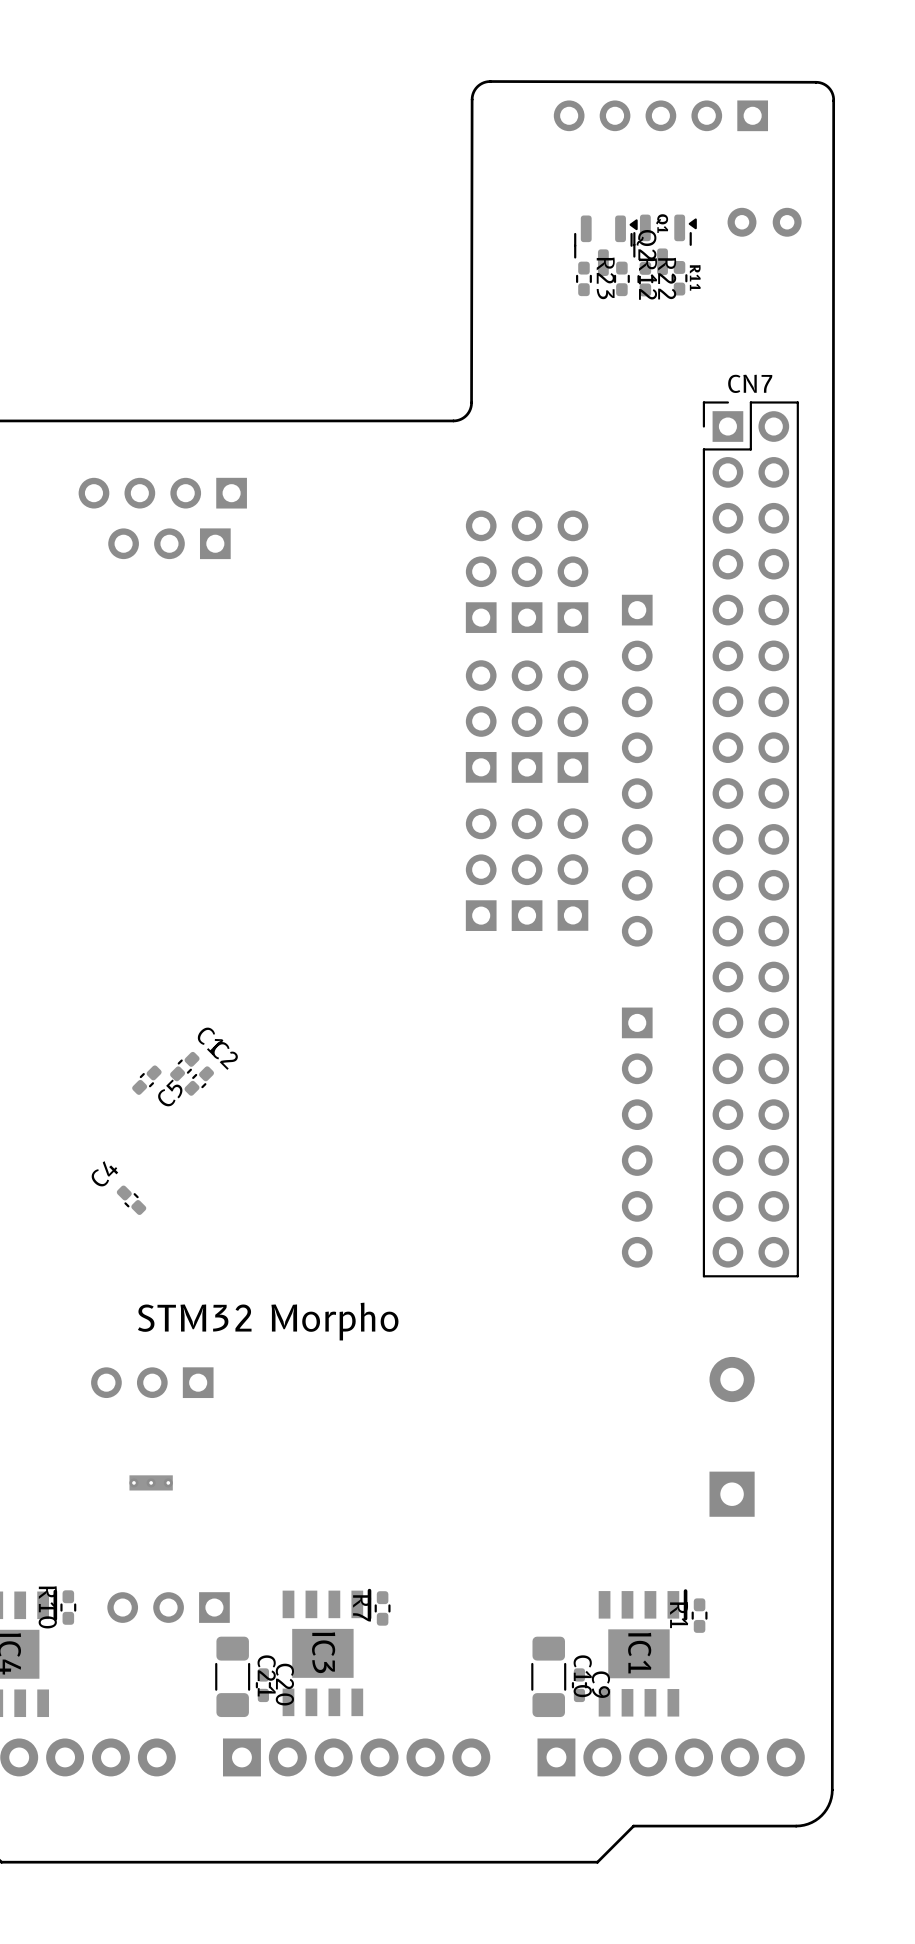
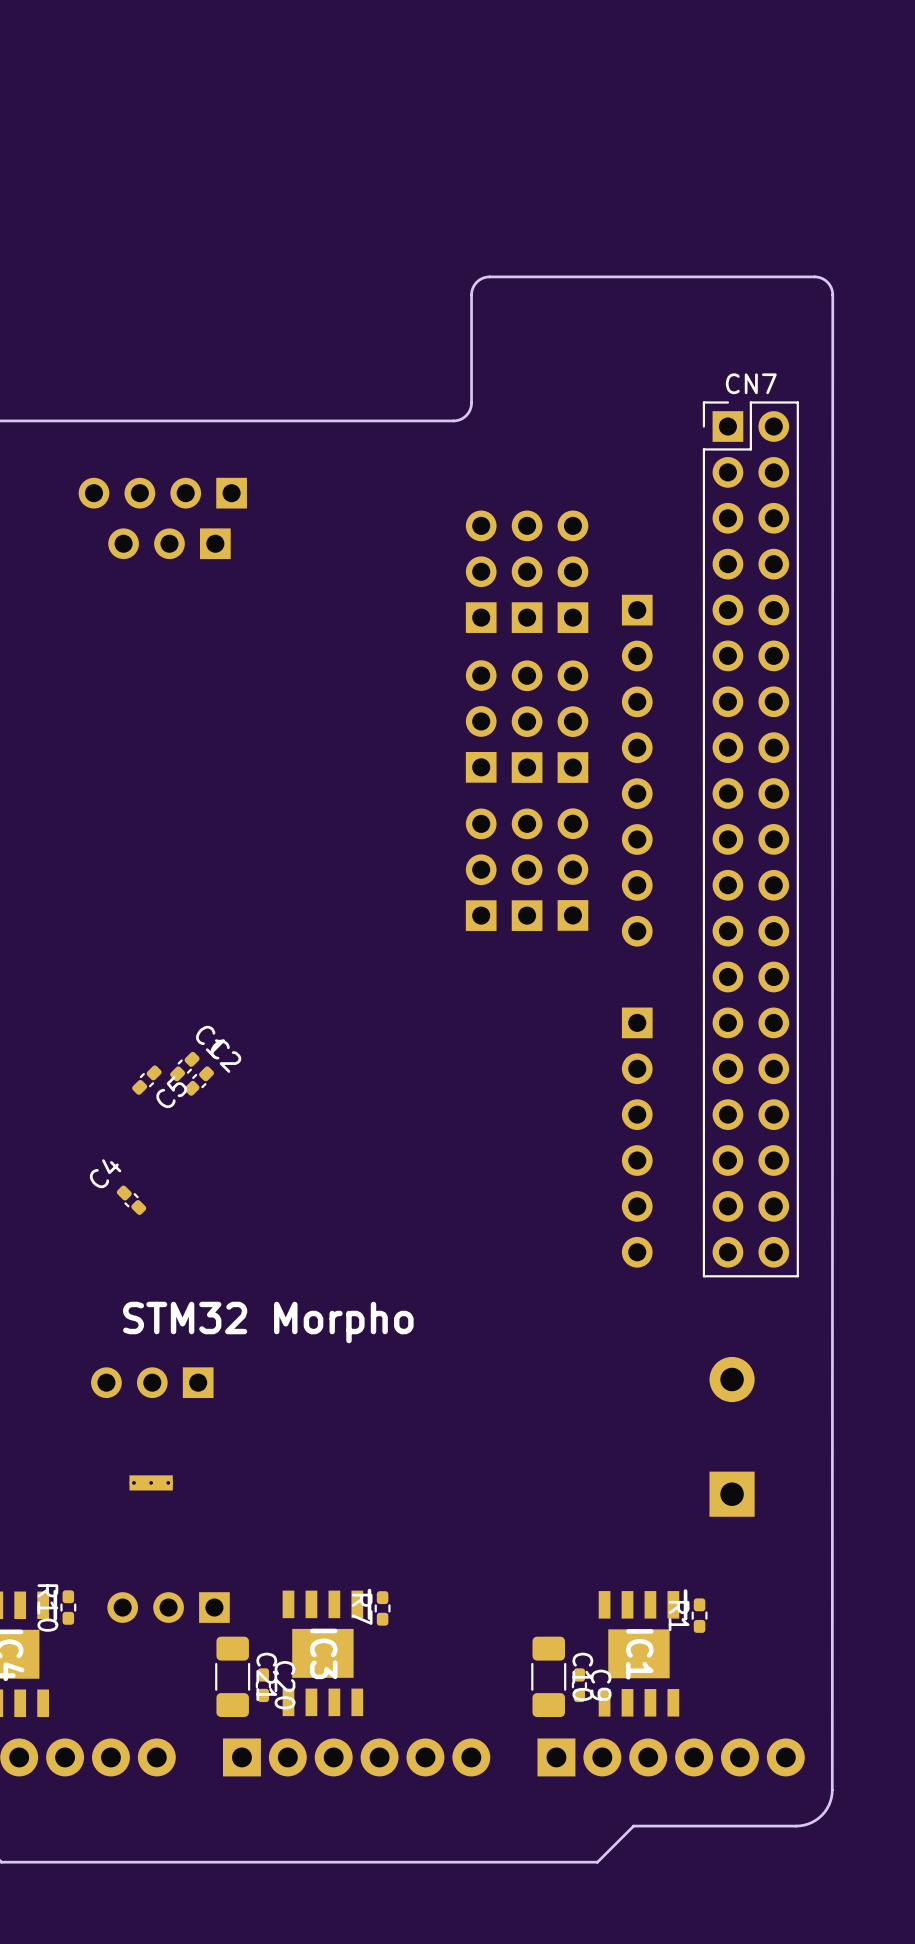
part: (660, 115) -> none
part: (764, 222) -> none
Q1: (665, 244) -> none
Q2: (605, 245) -> none
R23: (583, 278) -> none
R12: (621, 278) -> none
R11: (679, 278) -> none
R22: (645, 279) -> none
board edge: (471, 402) (472, 99) (473, 91) (478, 85) (490, 81) (816, 82) (828, 87) (833, 100) (832, 1789) -> (471, 402) (471, 292) (475, 283) (483, 277) (814, 276) (825, 280) (832, 290) (832, 1789)

